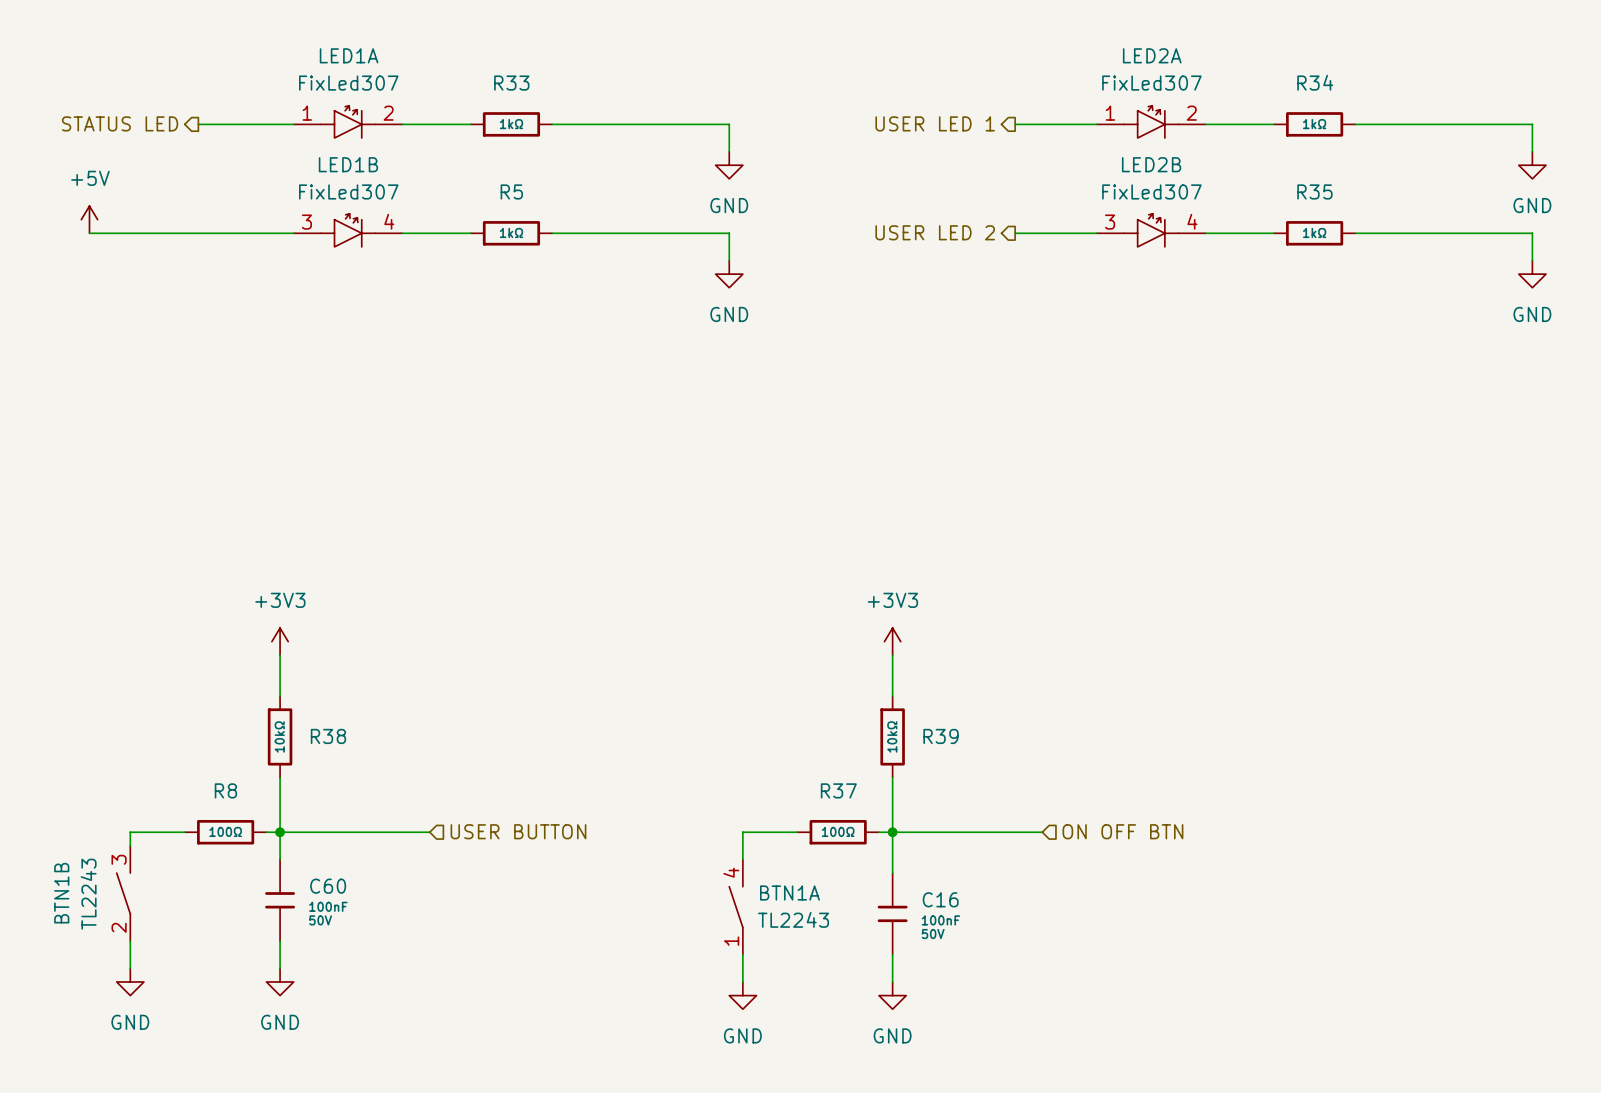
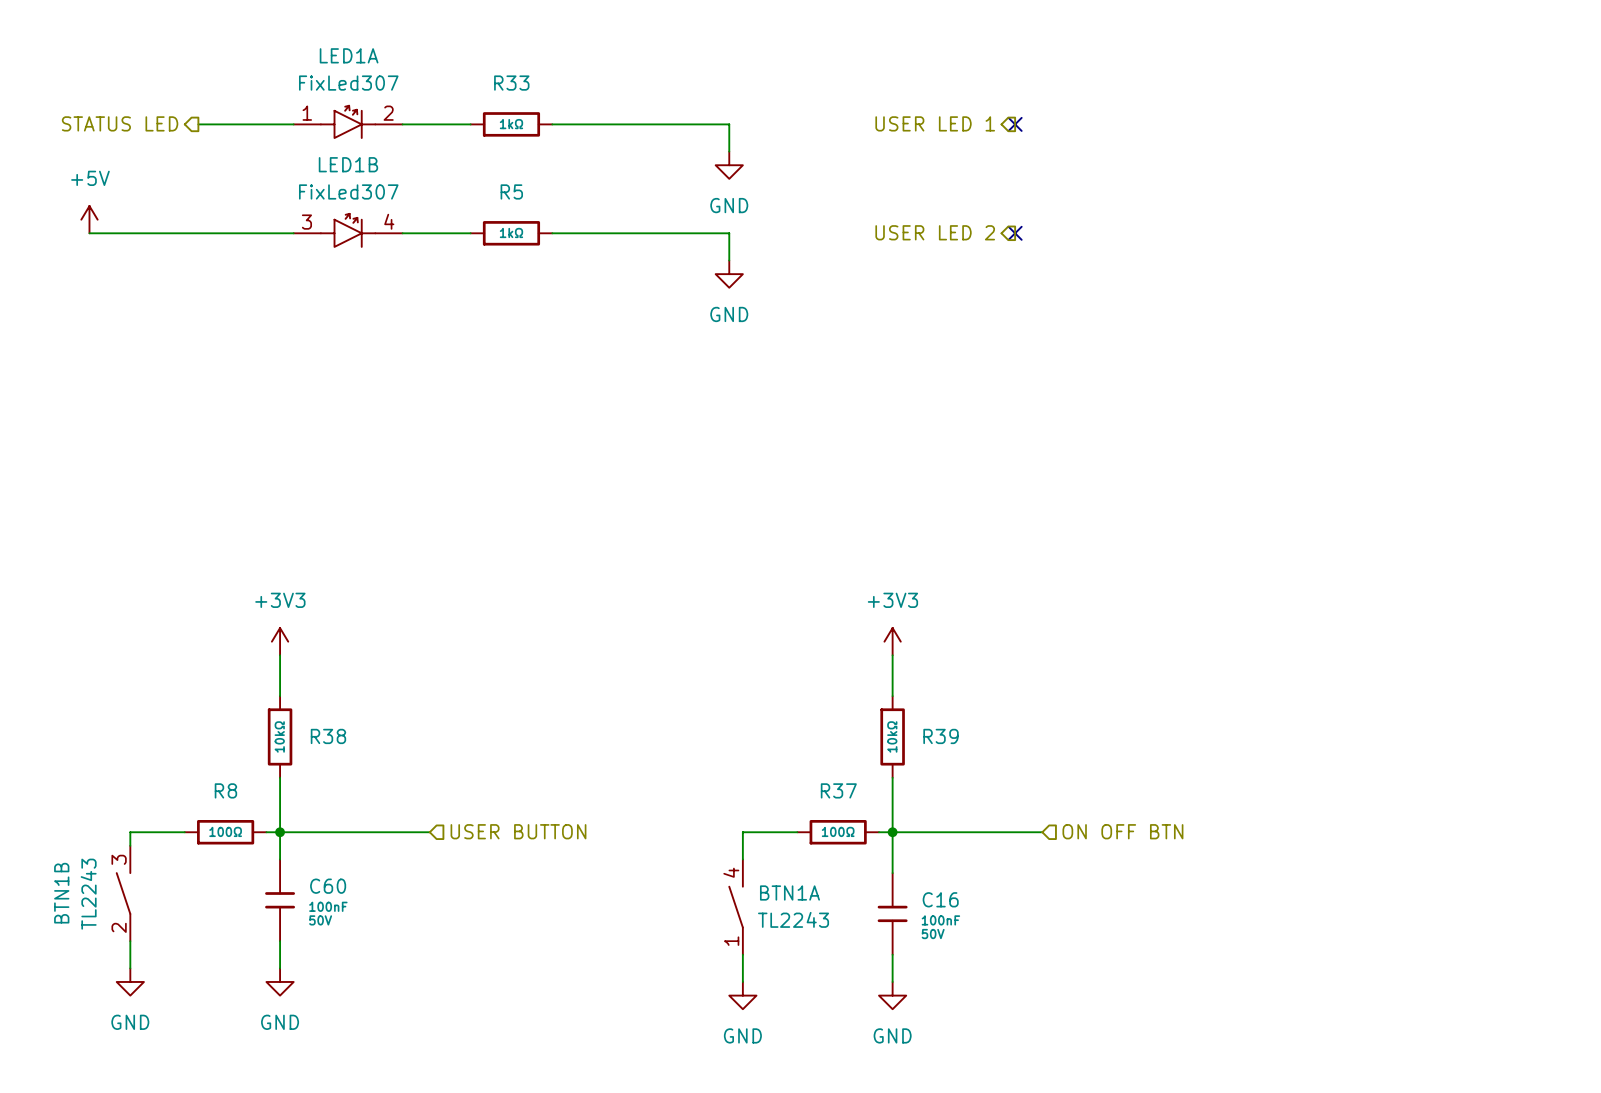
LED2A: FixLed307 (1151, 121) -> none
wire: (1015, 124) (1096, 124) -> none
no-connect mark: none -> (1015, 124)
wire: (1205, 124) (1273, 124) -> none
R34: 1kΩ (1314, 124) -> none
wire: (1355, 124) (1532, 124) (1532, 151) -> none
power symbol: GND (1532, 165) -> none
LED2B: FixLed307 (1151, 230) -> none
wire: (1015, 233) (1096, 233) -> none
no-connect mark: none -> (1015, 233)
wire: (1205, 233) (1273, 233) -> none
R35: 1kΩ (1314, 233) -> none
wire: (1355, 233) (1532, 233) (1532, 260) -> none
power symbol: GND (1532, 274) -> none

